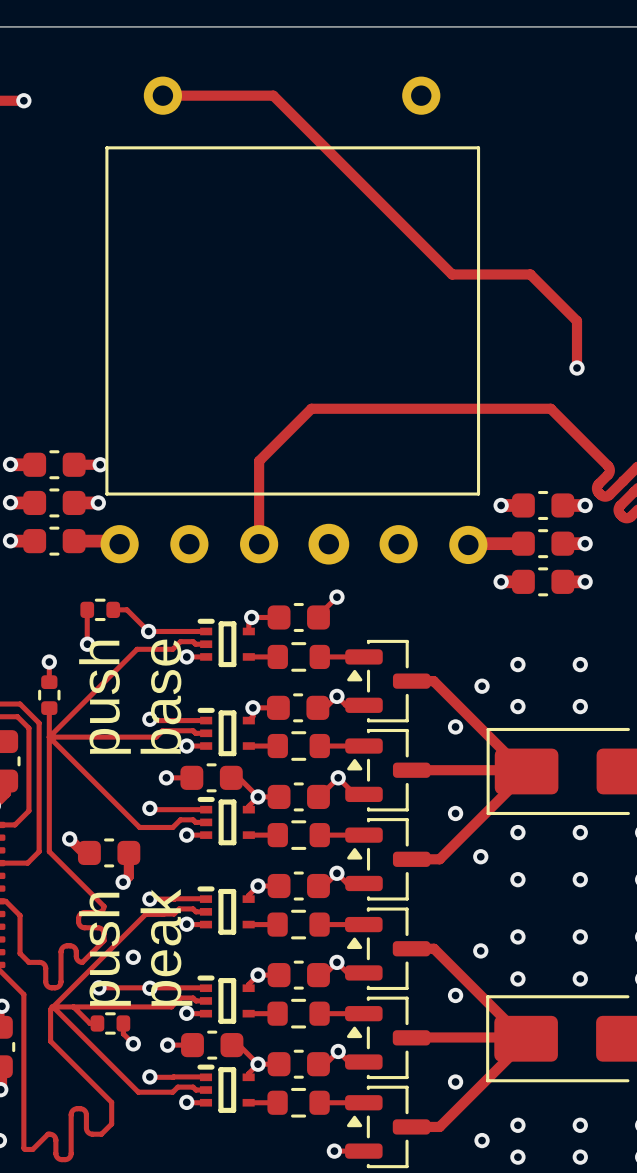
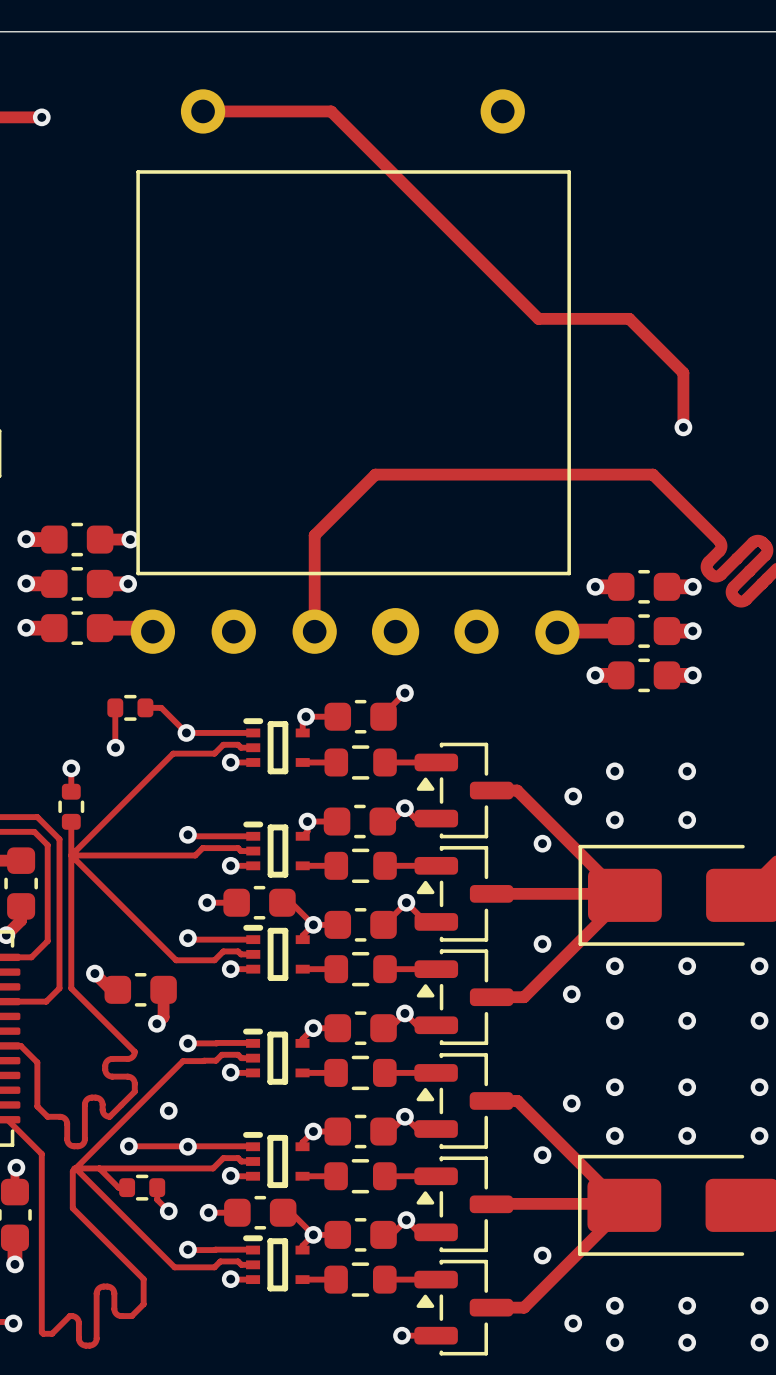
text: base (160, 696) -> none
text: push (105, 697) -> none
text: peak (166, 947) -> none
text: push (105, 949) -> none

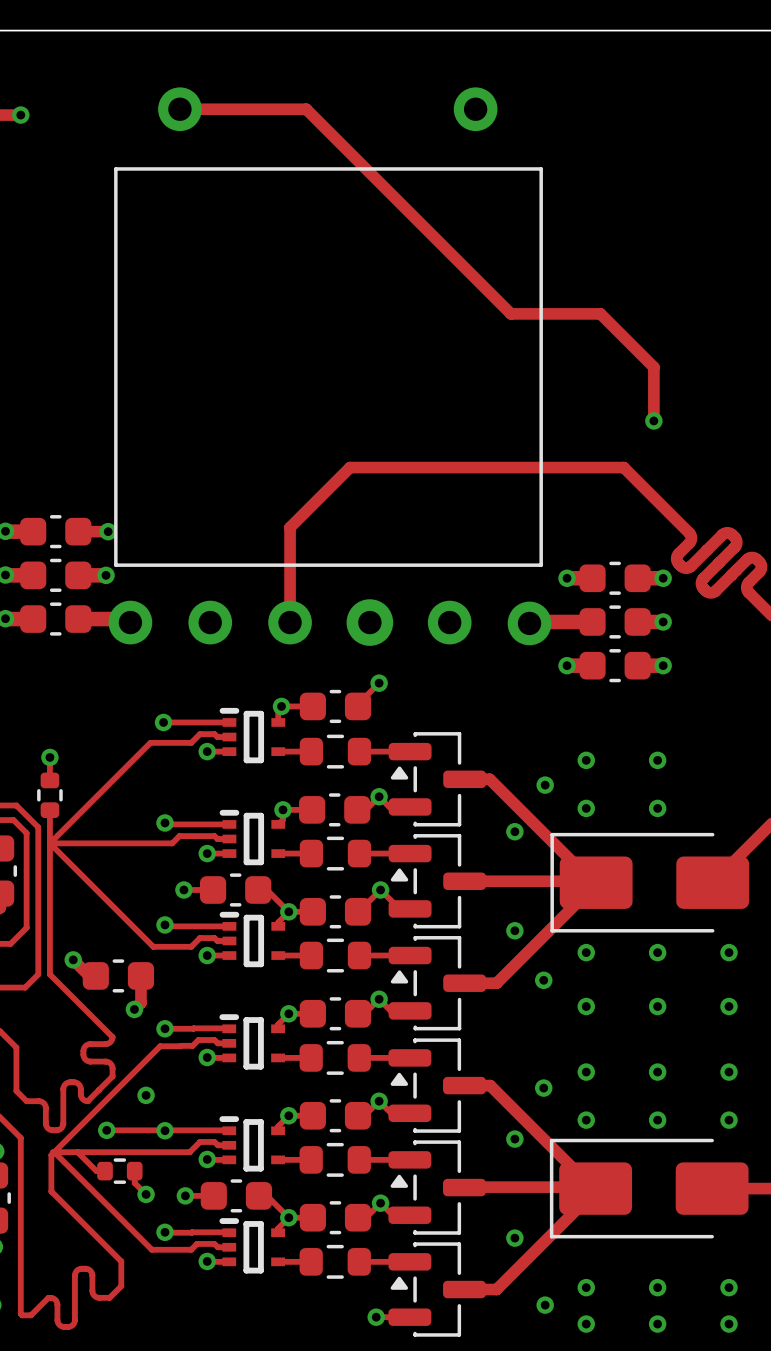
track: (115, 707) (115, 742) -> none
part: (130, 707) -> none
track: (145, 707) (161, 707) (186, 732) -> none
via: (115, 747) -> none

